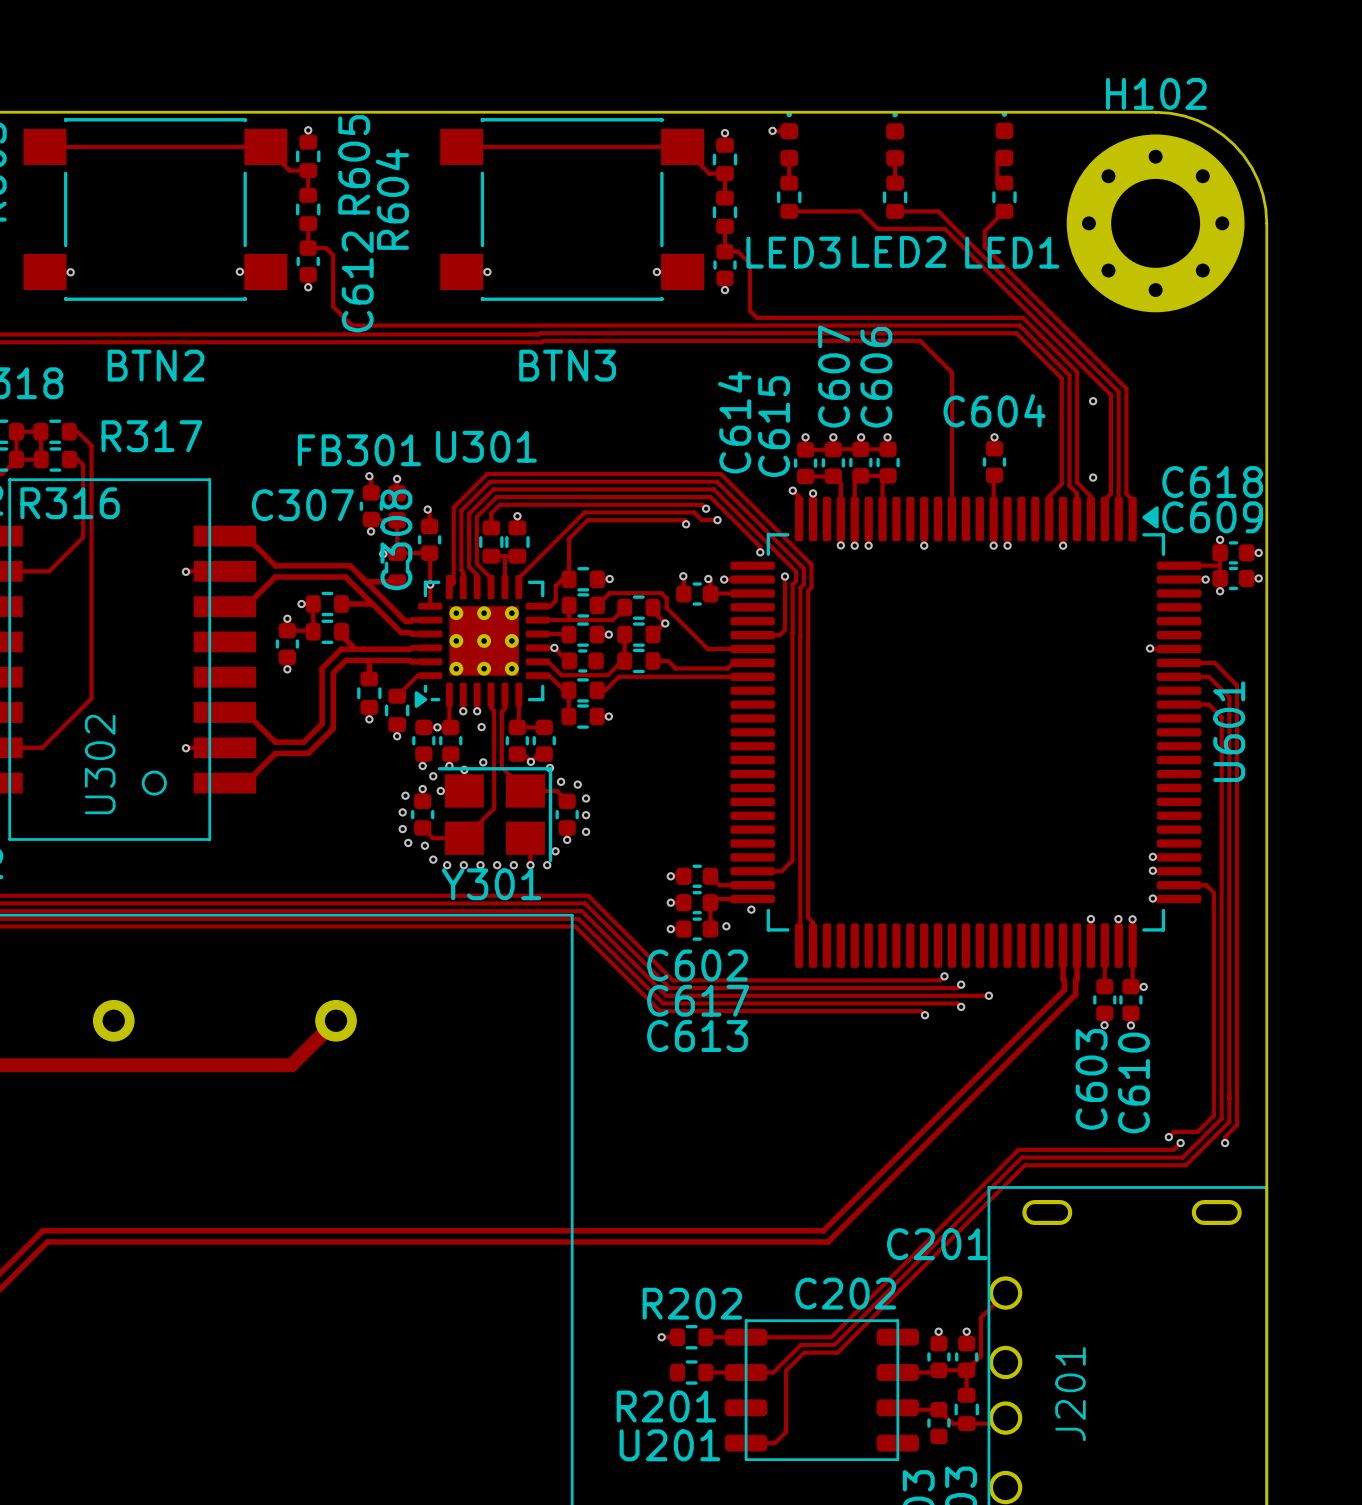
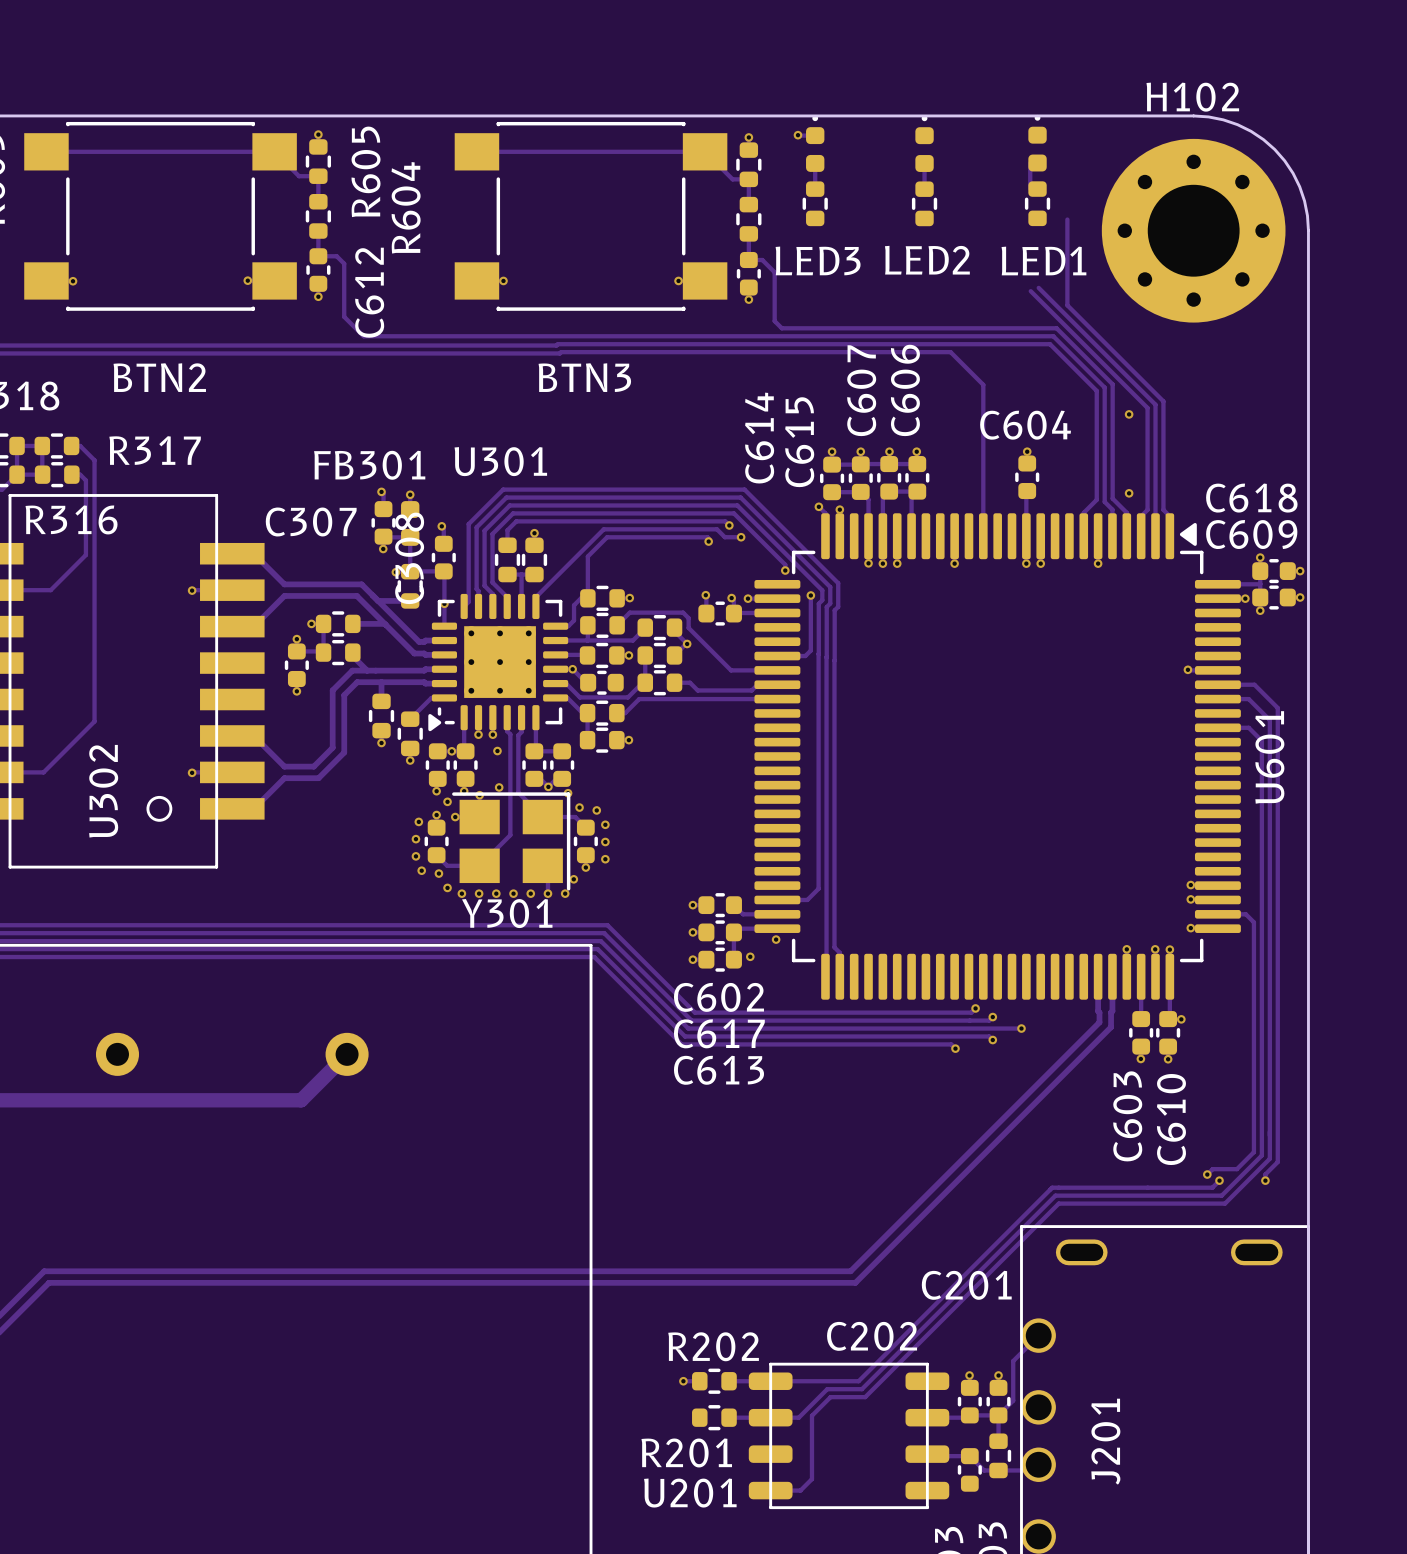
track: (789, 211) (860, 211) (877, 228) (944, 228) (997, 281) -> none
track: (895, 211) (938, 211) (1005, 278) -> none
track: (1004, 211) (984, 231) (984, 247) (1033, 295) -> (1067, 219) (1067, 305)

